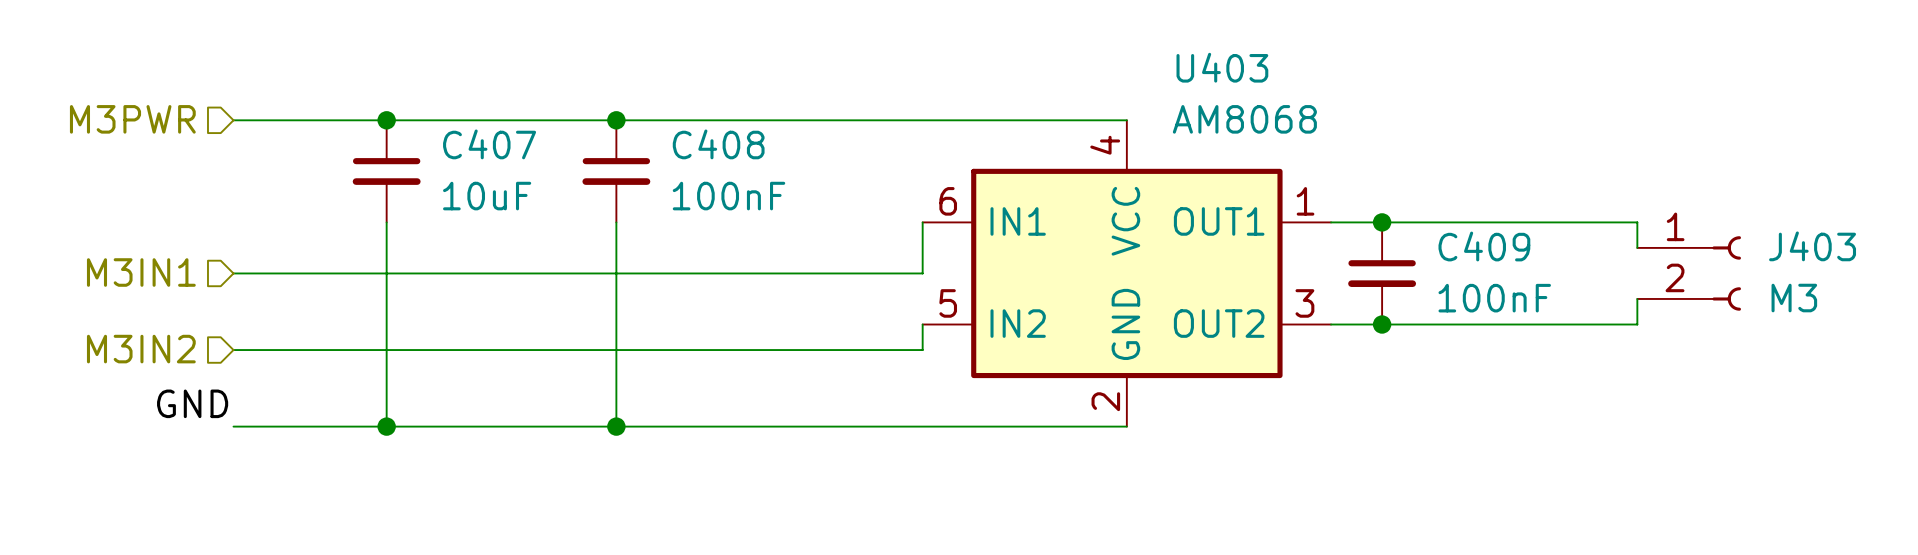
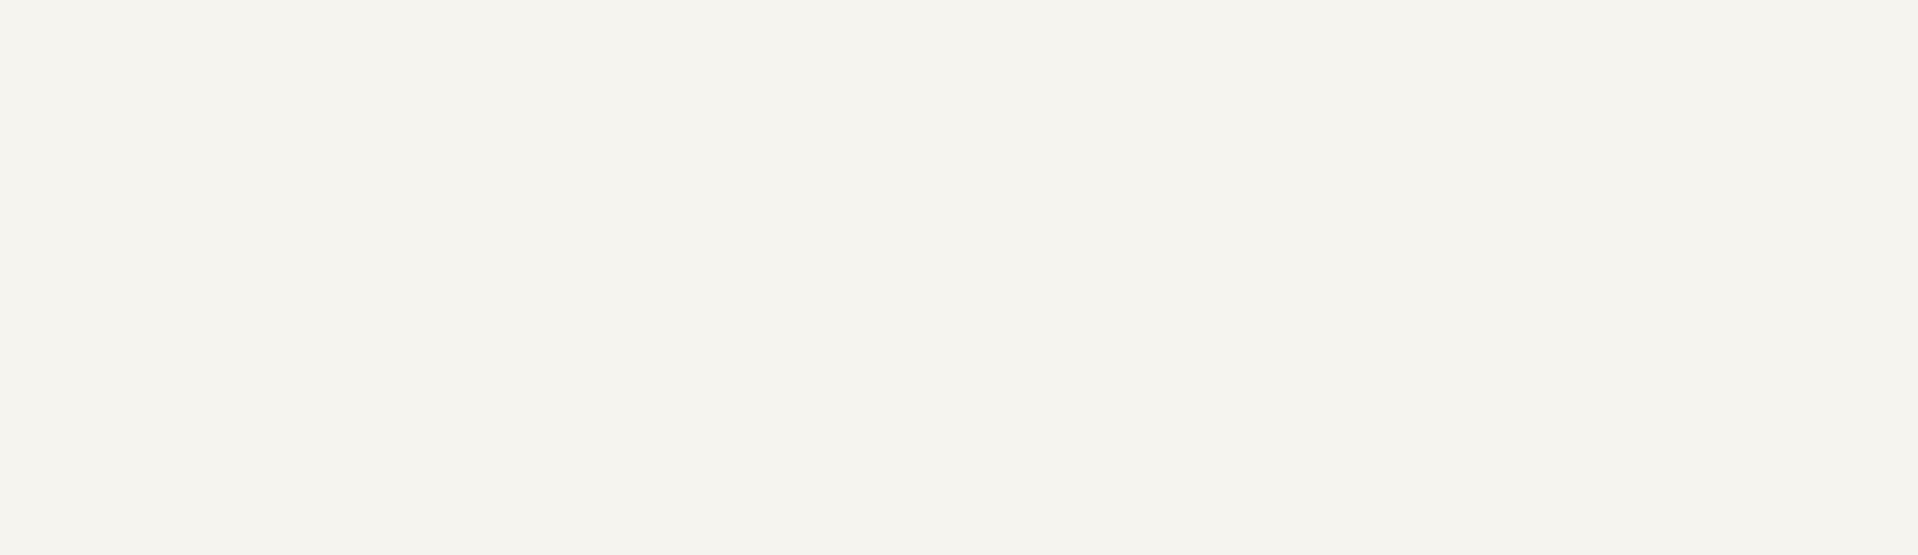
hierarchical label: M3PWR (132, 119) -> none
wire: (233, 120) (1126, 120) -> none
junction: (386, 120) -> none
junction: (616, 120) -> none
C407: 10uF (386, 171) -> none
C408: 100nF (616, 171) -> none
wire: (386, 222) (386, 426) -> none
wire: (616, 222) (616, 426) -> none
wire: (922, 222) (922, 273) (233, 273) -> none
wire: (1331, 222) (1637, 222) (1637, 247) -> none
junction: (1382, 222) -> none
hierarchical label: M3IN1 (141, 272) -> none
U403: AM8068 (1126, 273) -> none
C409: 100nF (1382, 273) -> none
J403: M3 (1689, 273) -> none
wire: (1637, 298) (1637, 324) (1331, 324) -> none
wire: (922, 324) (922, 350) (233, 350) -> none
junction: (1382, 324) -> none
hierarchical label: M3IN2 (141, 349) -> none
label: GND (192, 403) -> none
wire: (233, 426) (1126, 426) -> none
junction: (386, 426) -> none
junction: (616, 426) -> none

